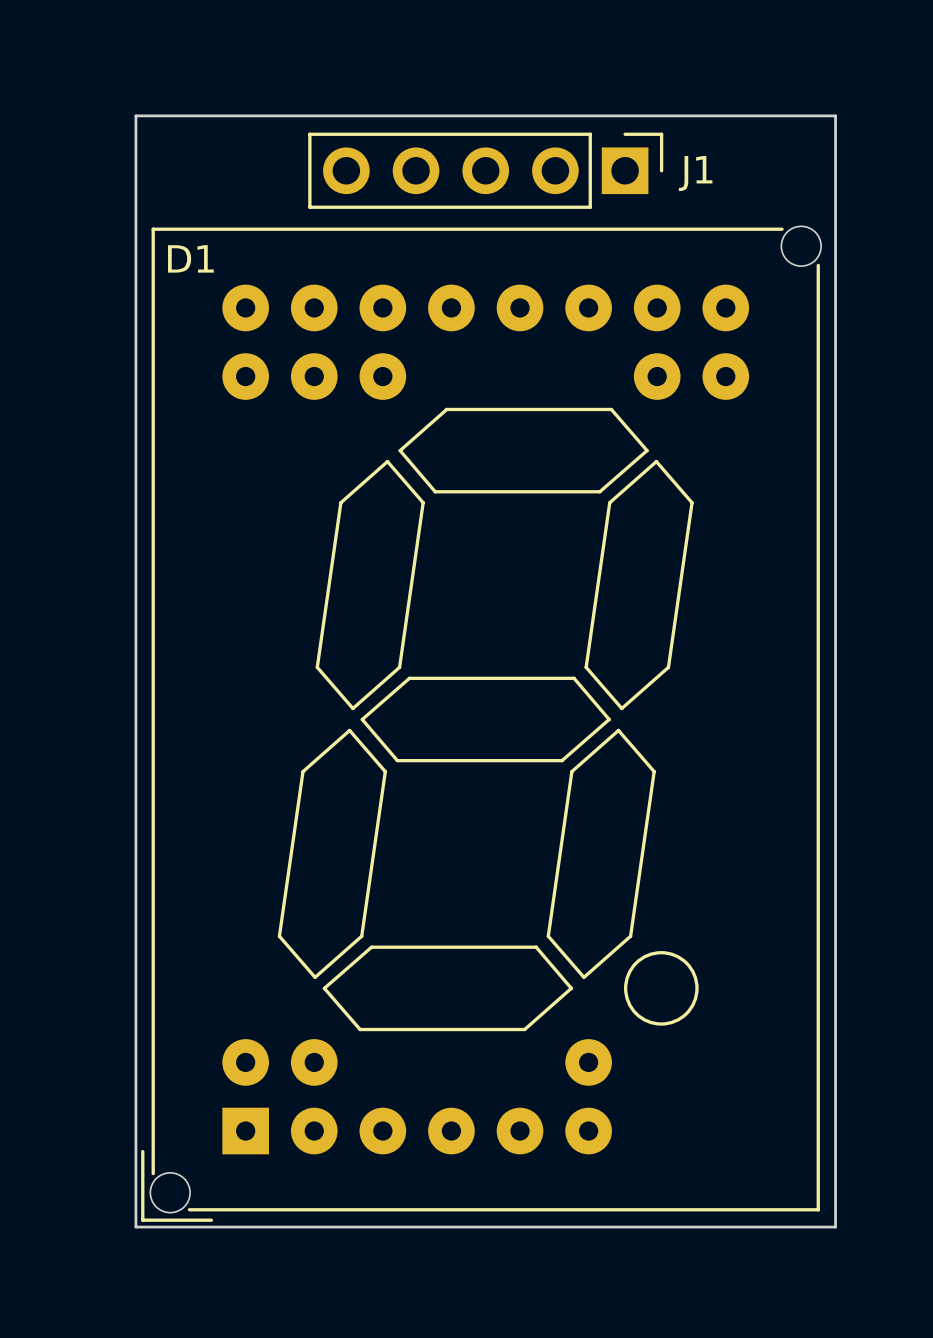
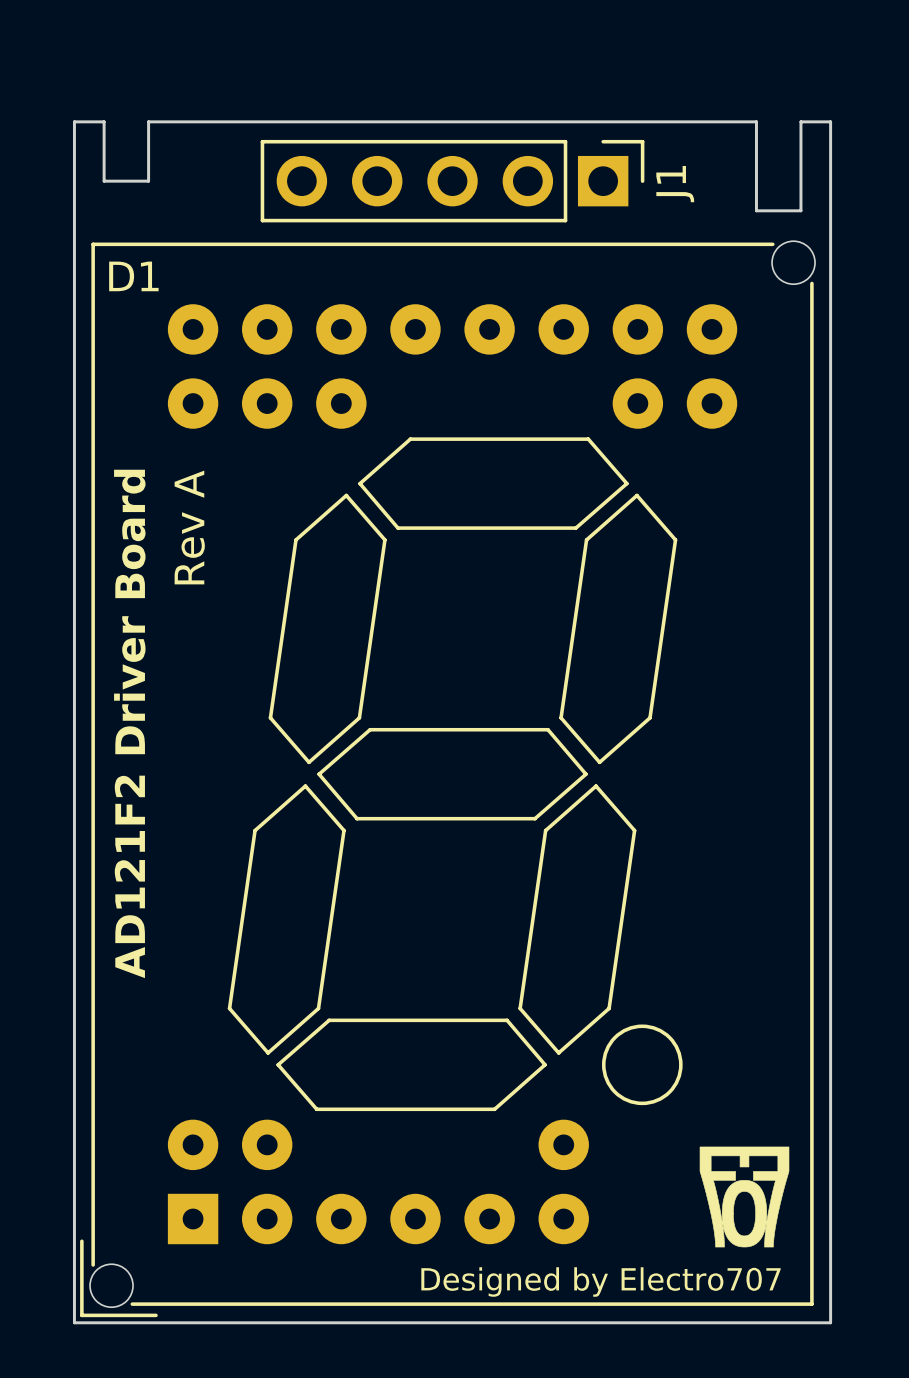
board edge: (163, 115) (204, 115) -> (104, 121) (104, 181) (148, 181) (148, 121)
board edge: (766, 115) (808, 115) -> (756, 121) (756, 210) (800, 210) (800, 121)
J1 name rotation: 0° (695, 173) -> 90° counterclockwise (675, 184)
text: none -> Rev A (189, 527)
text: none -> AD121F2 Driver Board (129, 723)
drawing: none -> [699, 1146, 790, 1248]
text: none -> Designed by Electro707 (600, 1282)

